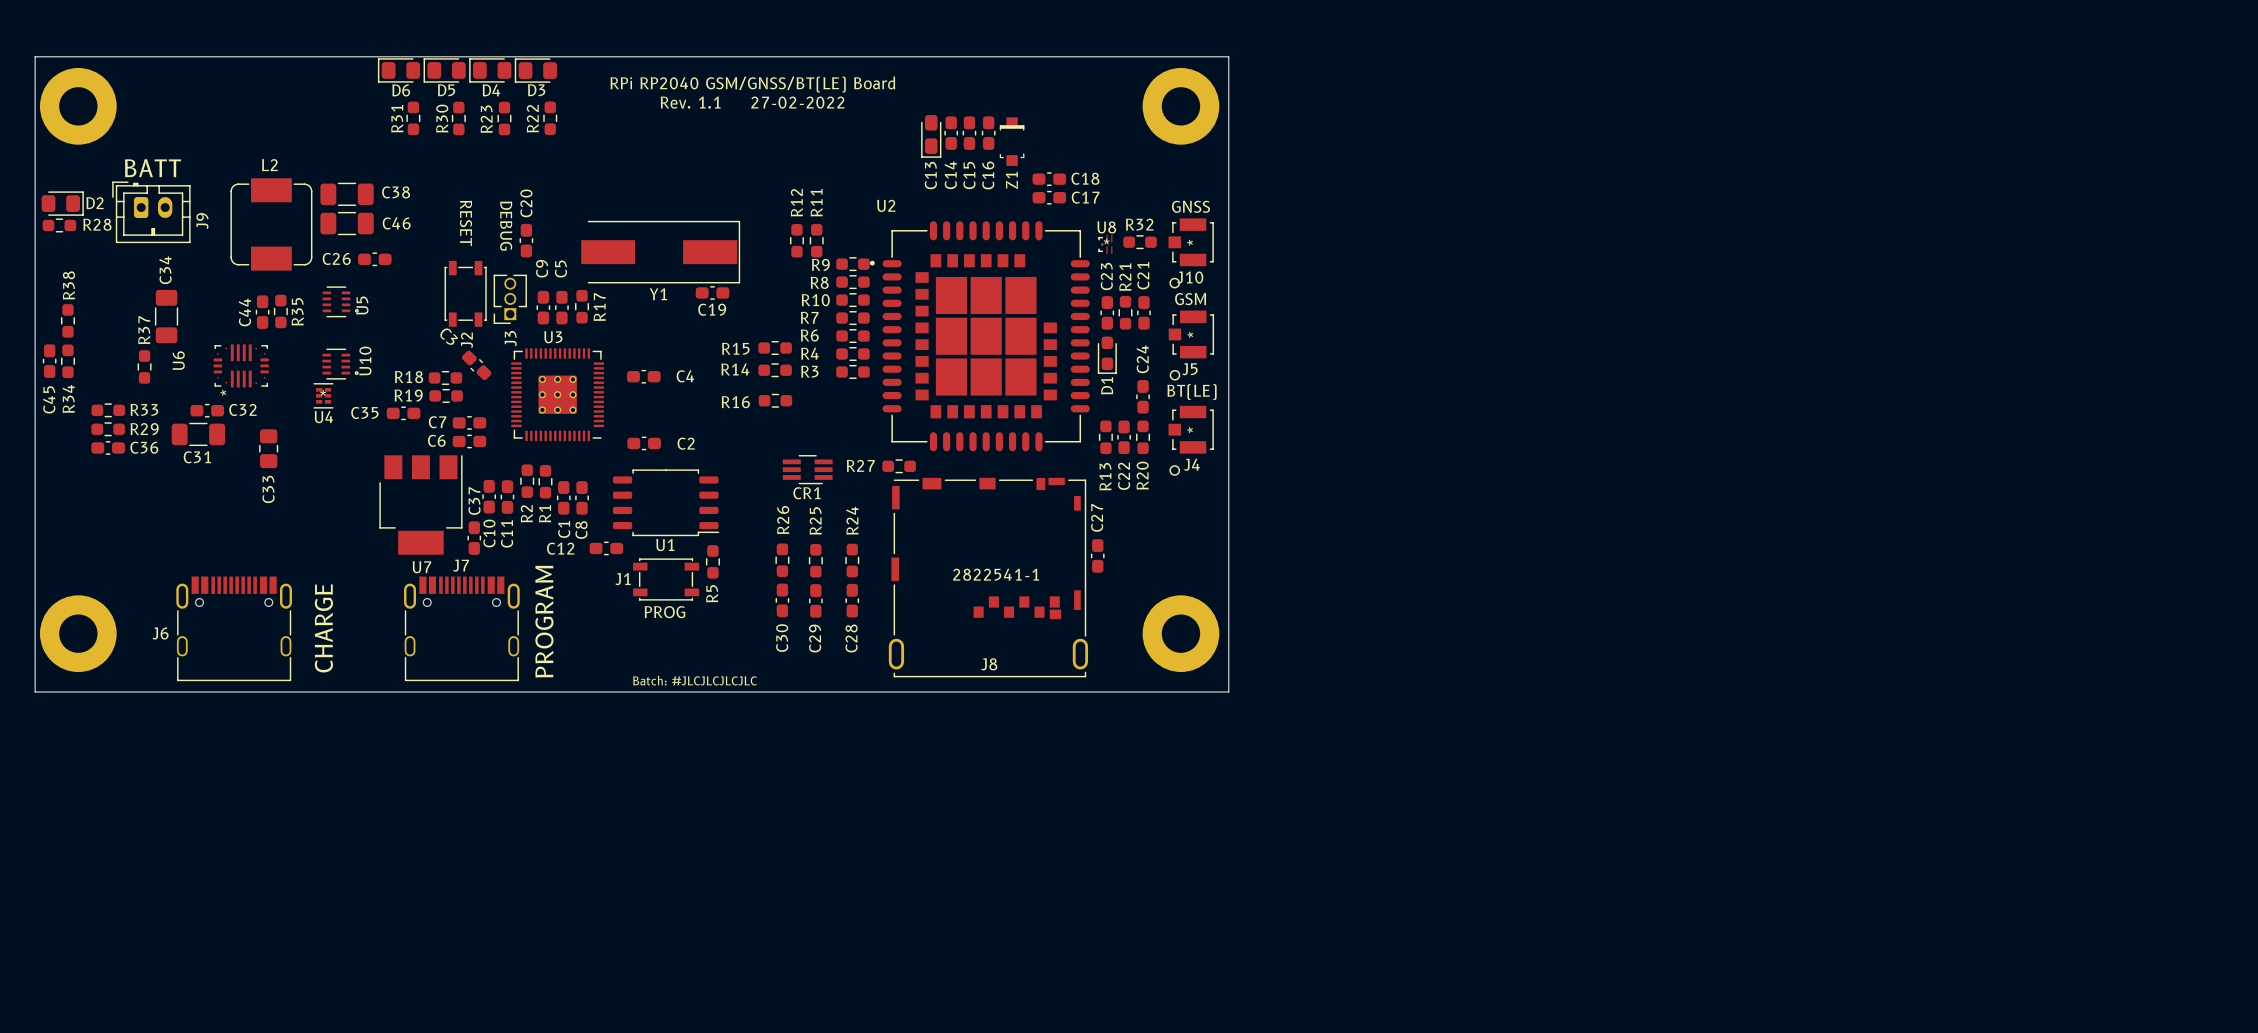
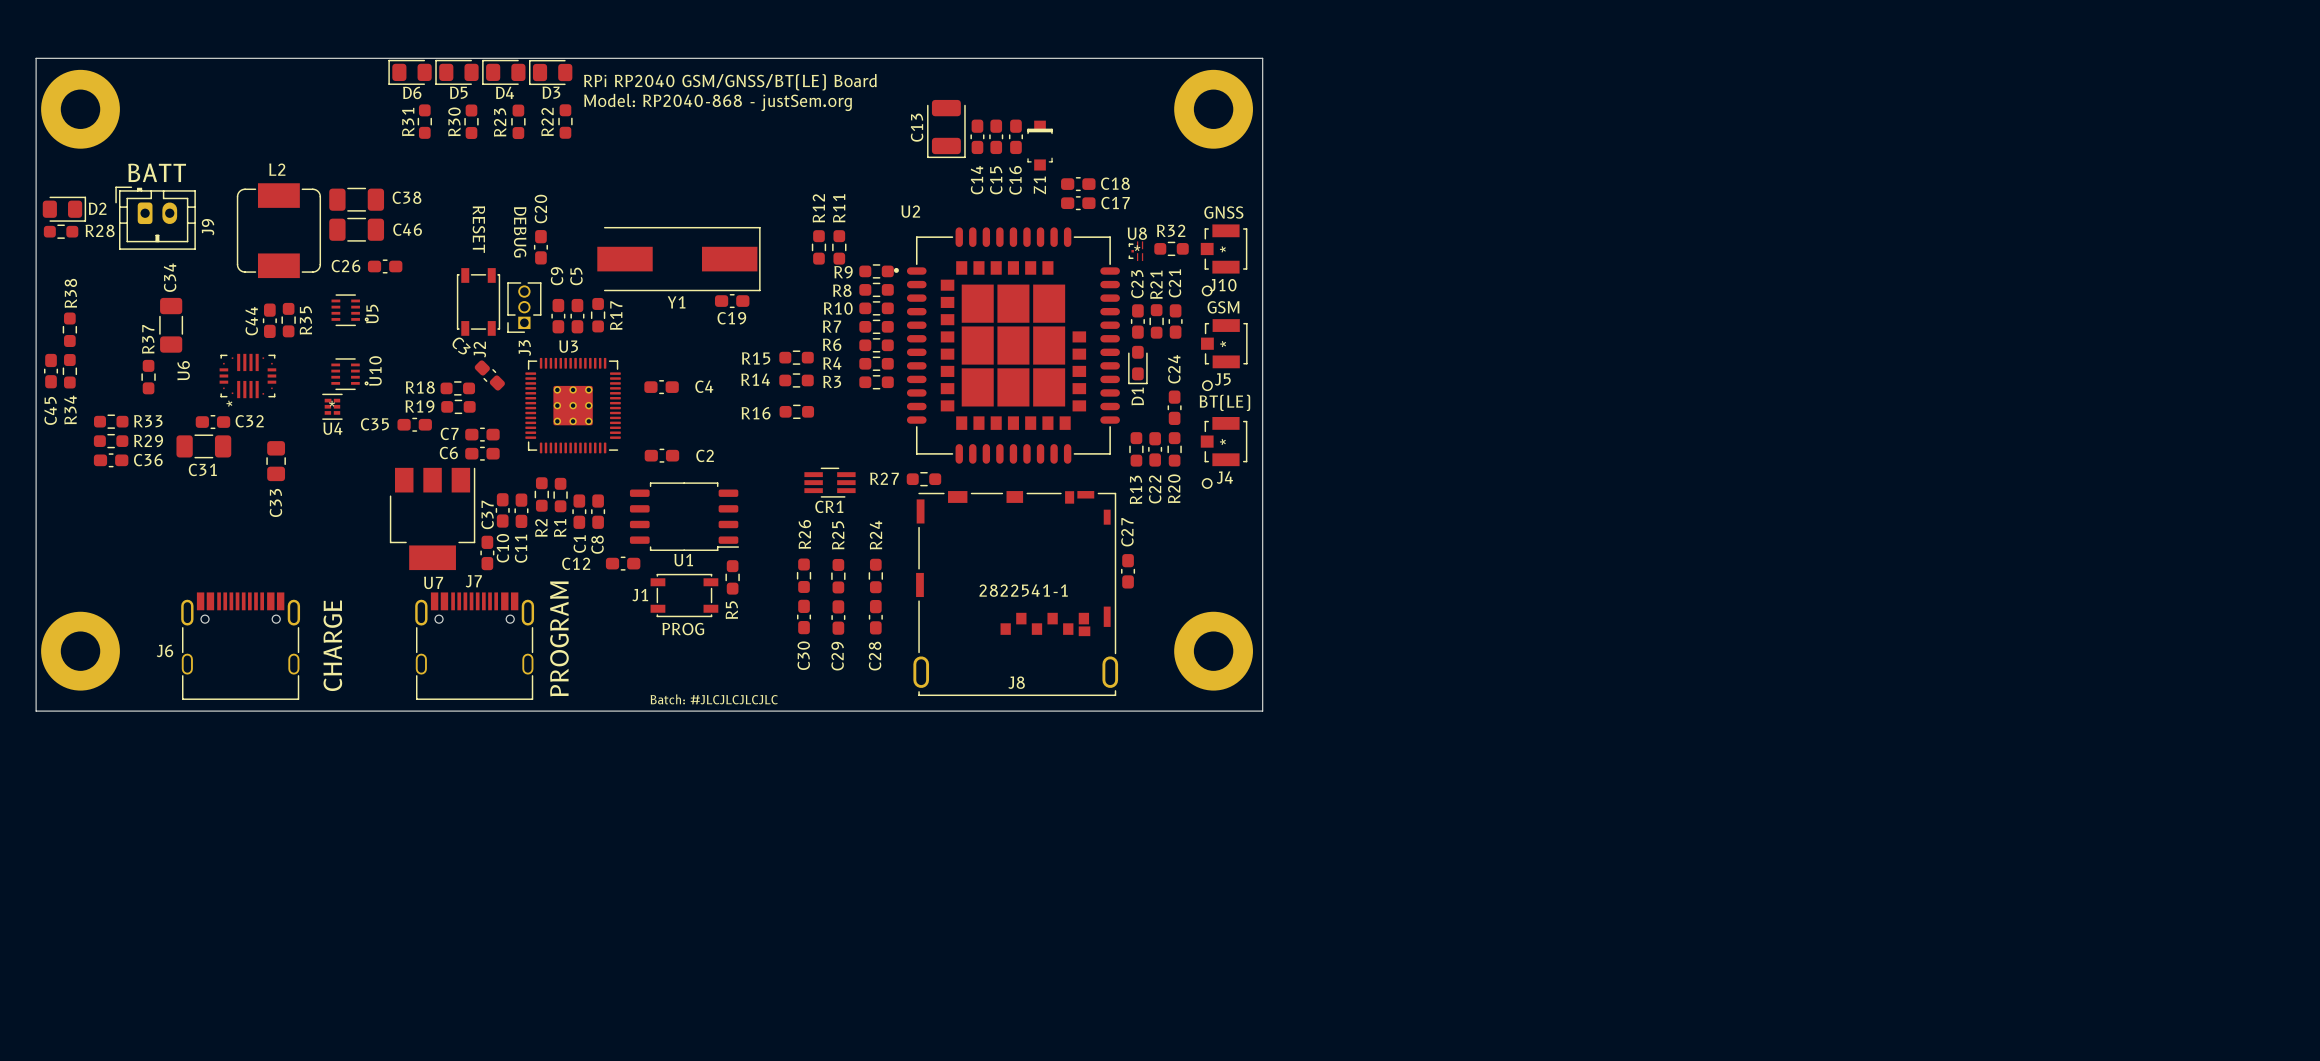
text position: RPi RP2040 GSM/GNSS/BT(LE) Board (752, 84) -> RPi RP2040 GSM/GNSS/BT(LE) Board (730, 82)
text: none -> Model: RP2040-868 - justSem.org (718, 102)
text: Rev. 1.1 27-02-2022 (752, 102) -> none
C13 footprint: [921, 114, 942, 158] -> [927, 99, 966, 159]
C13 name position: C13 (930, 175) -> C13 (917, 127)

